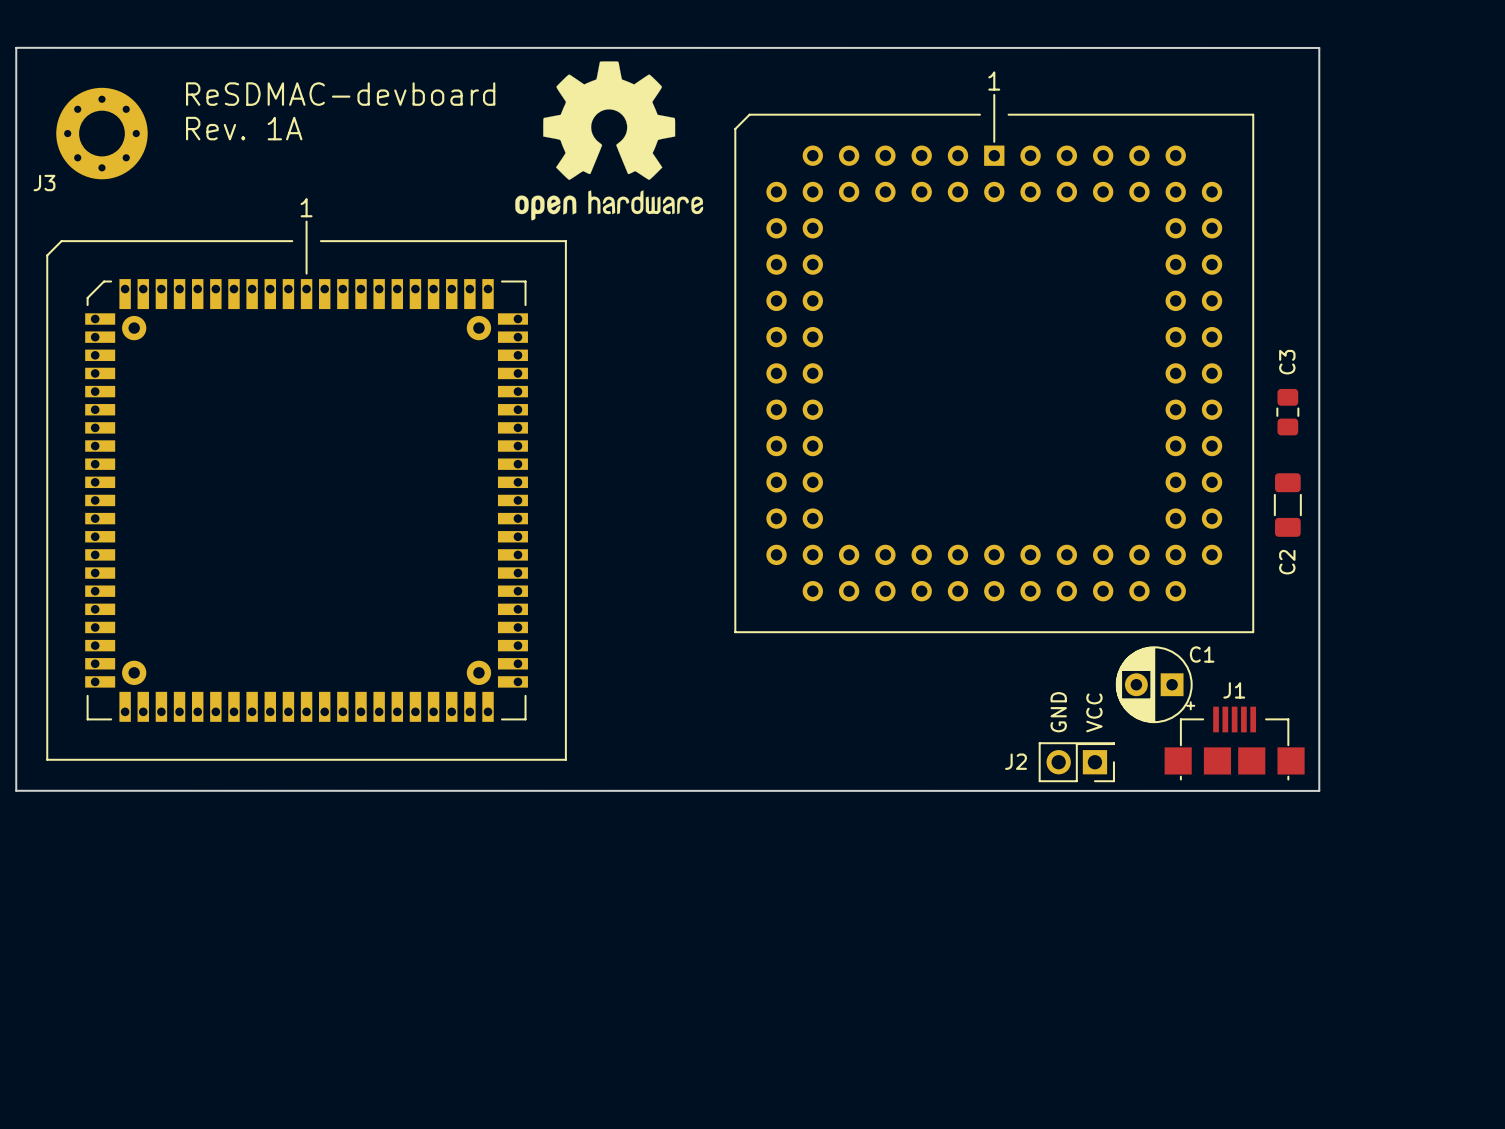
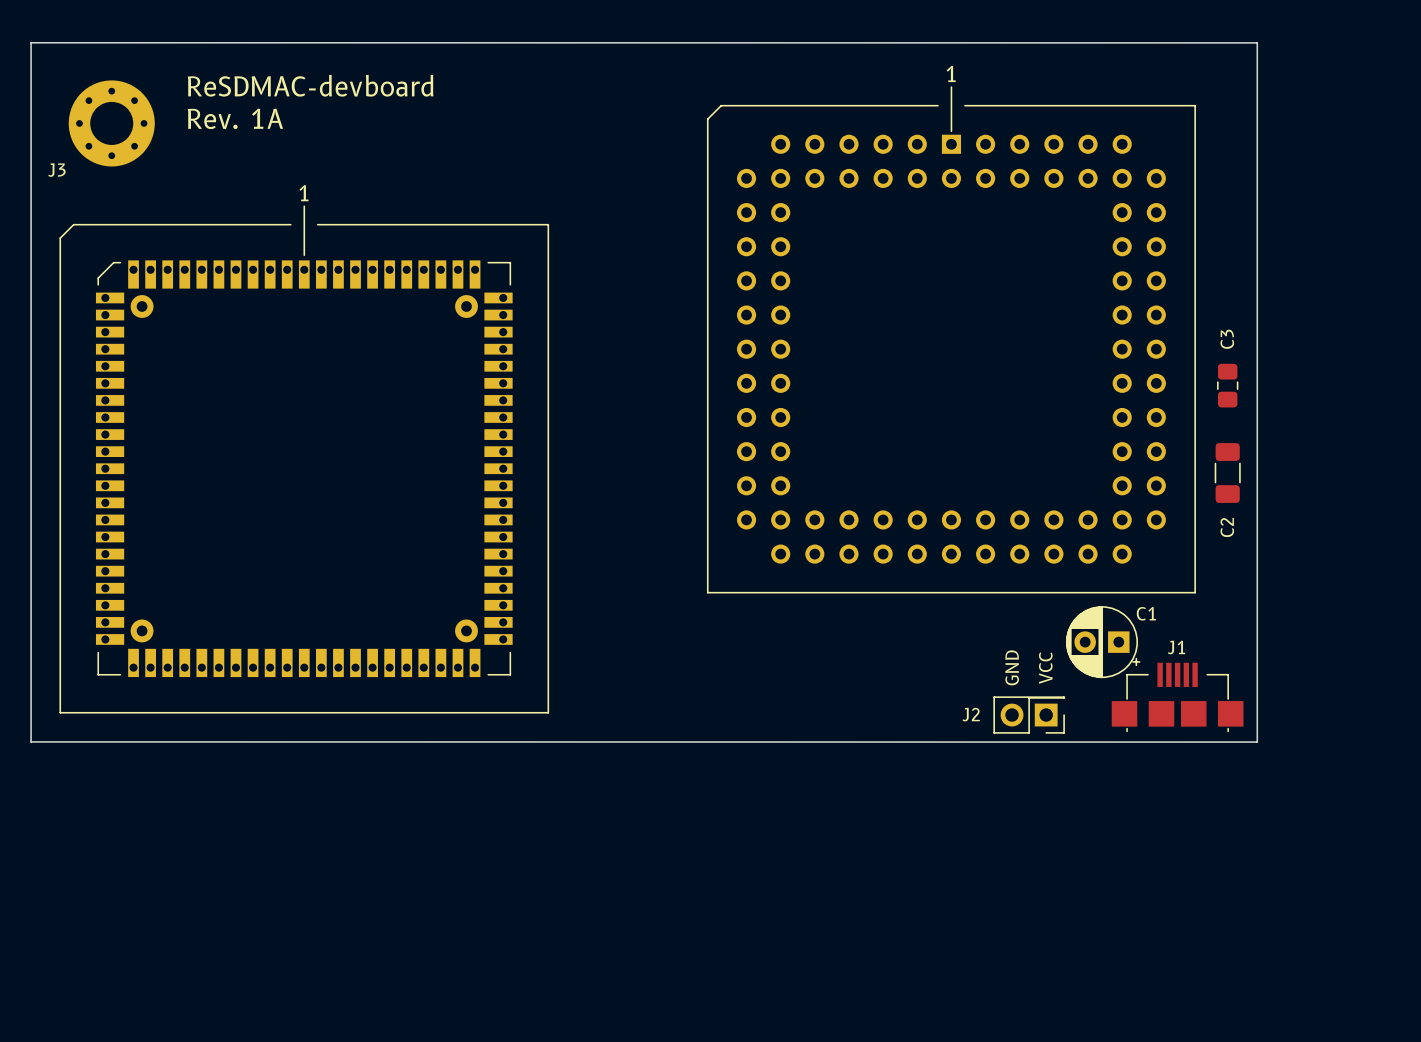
drawing: [515, 61, 704, 221] -> none

